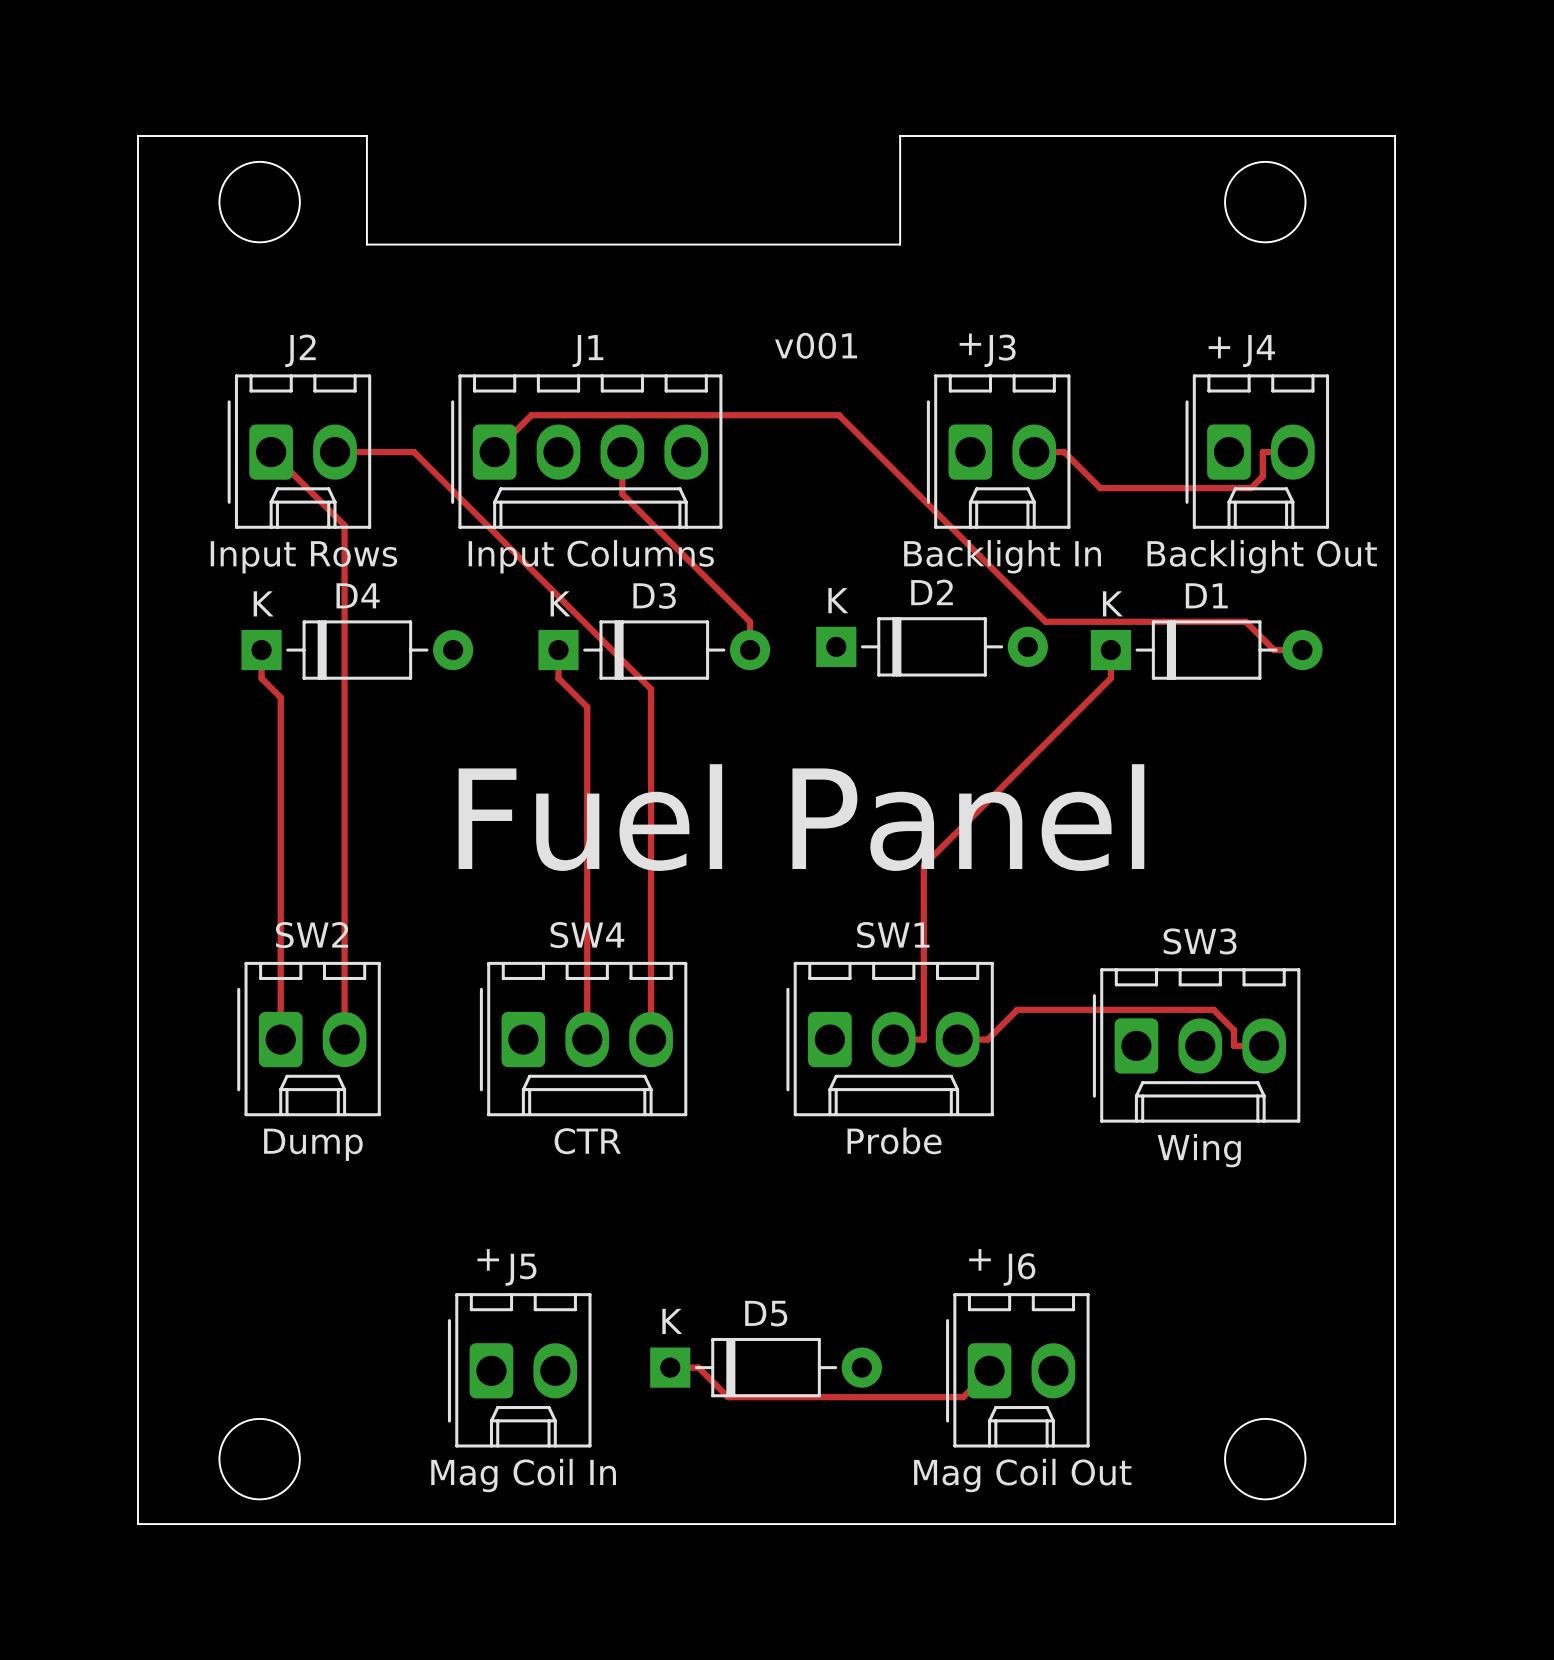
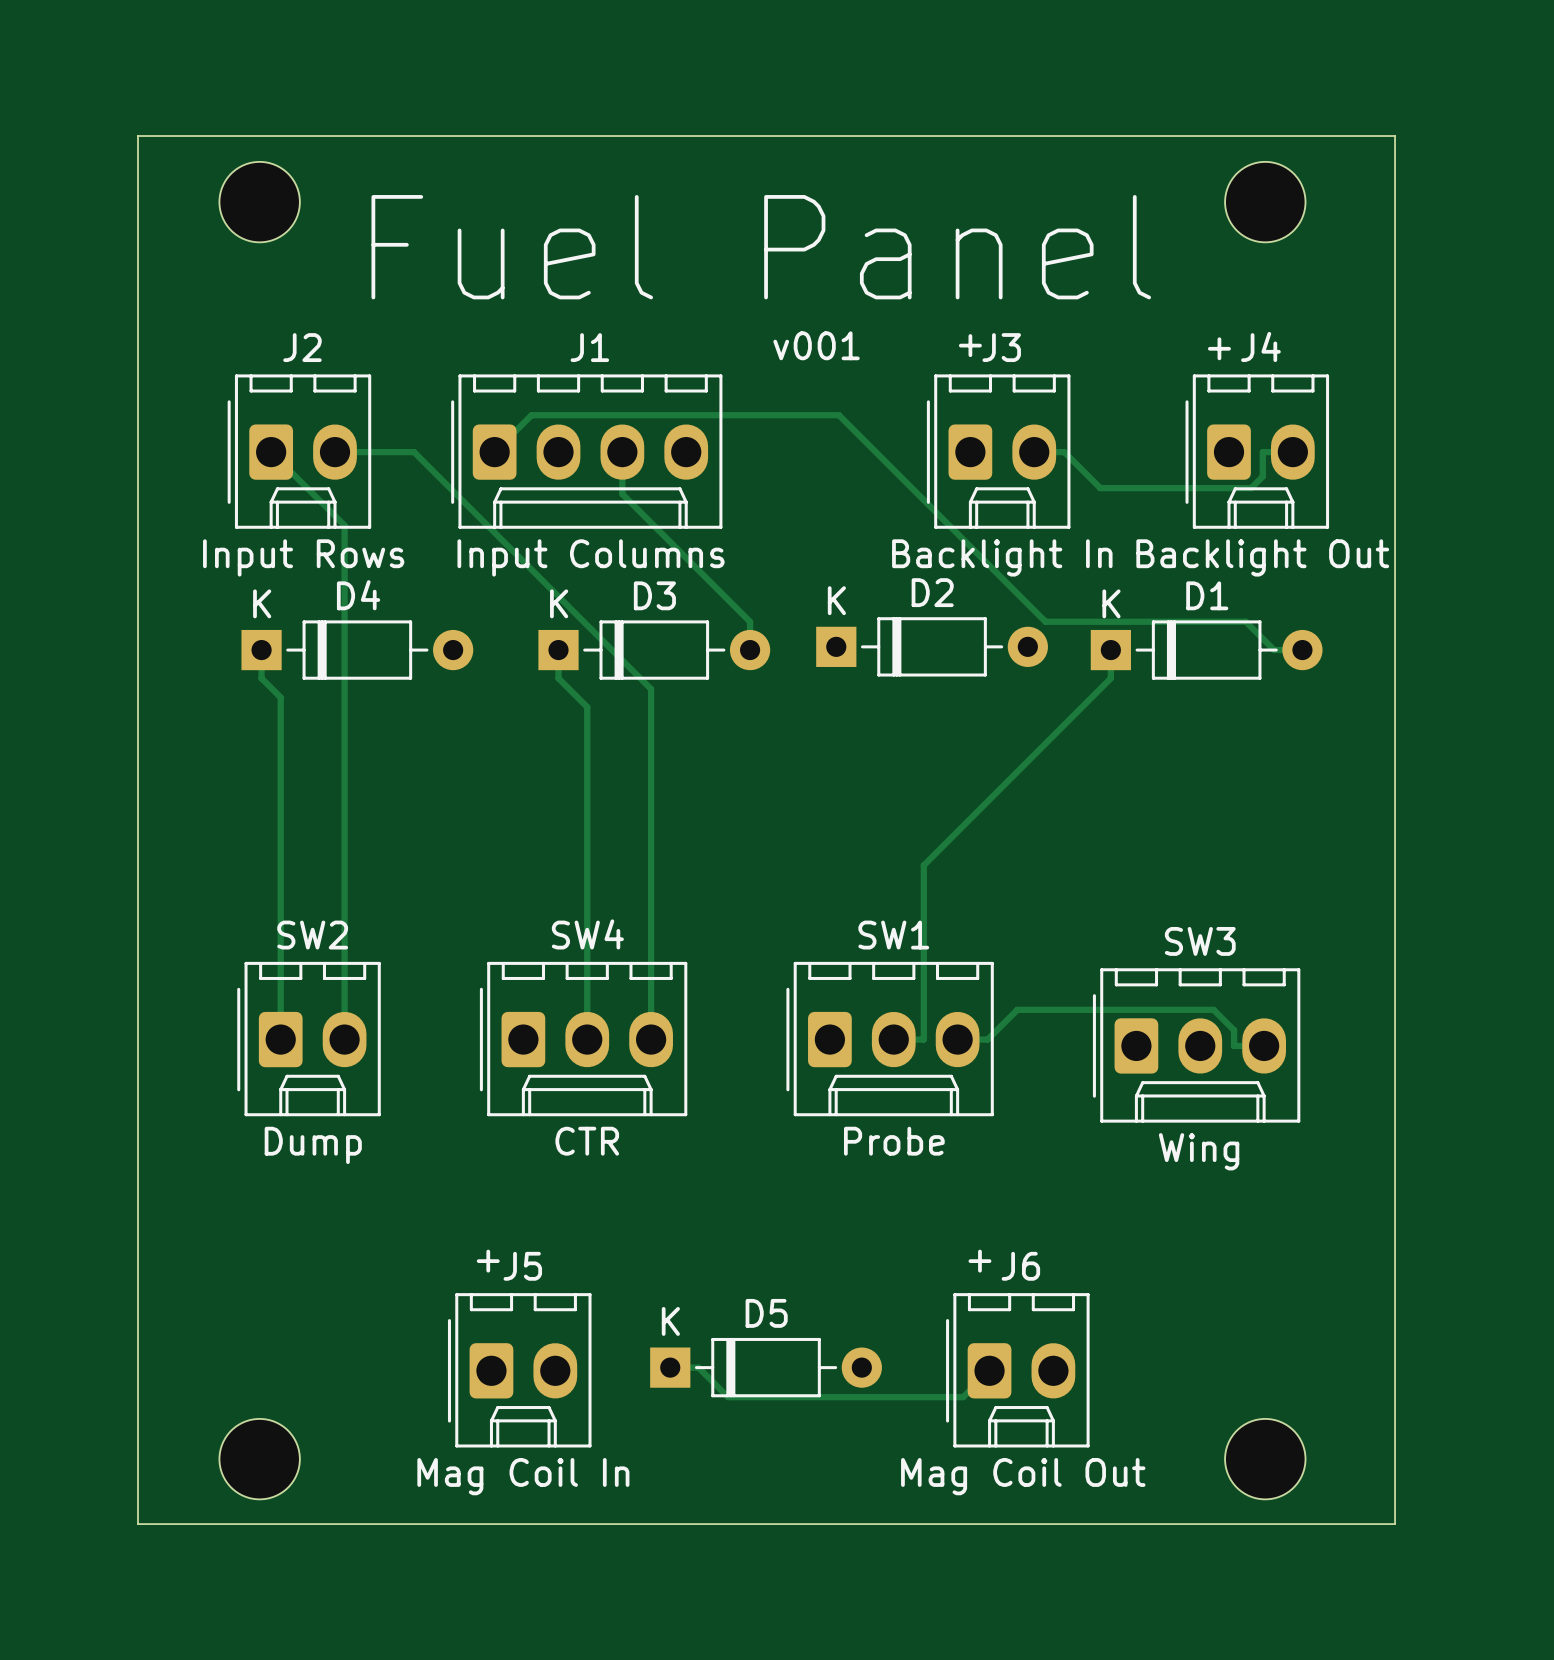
board edge: (366, 136) (366, 244) (900, 244) (900, 136) -> (366, 136) (900, 136)
text position: Fuel Panel (801, 817) -> Fuel Panel (761, 247)

